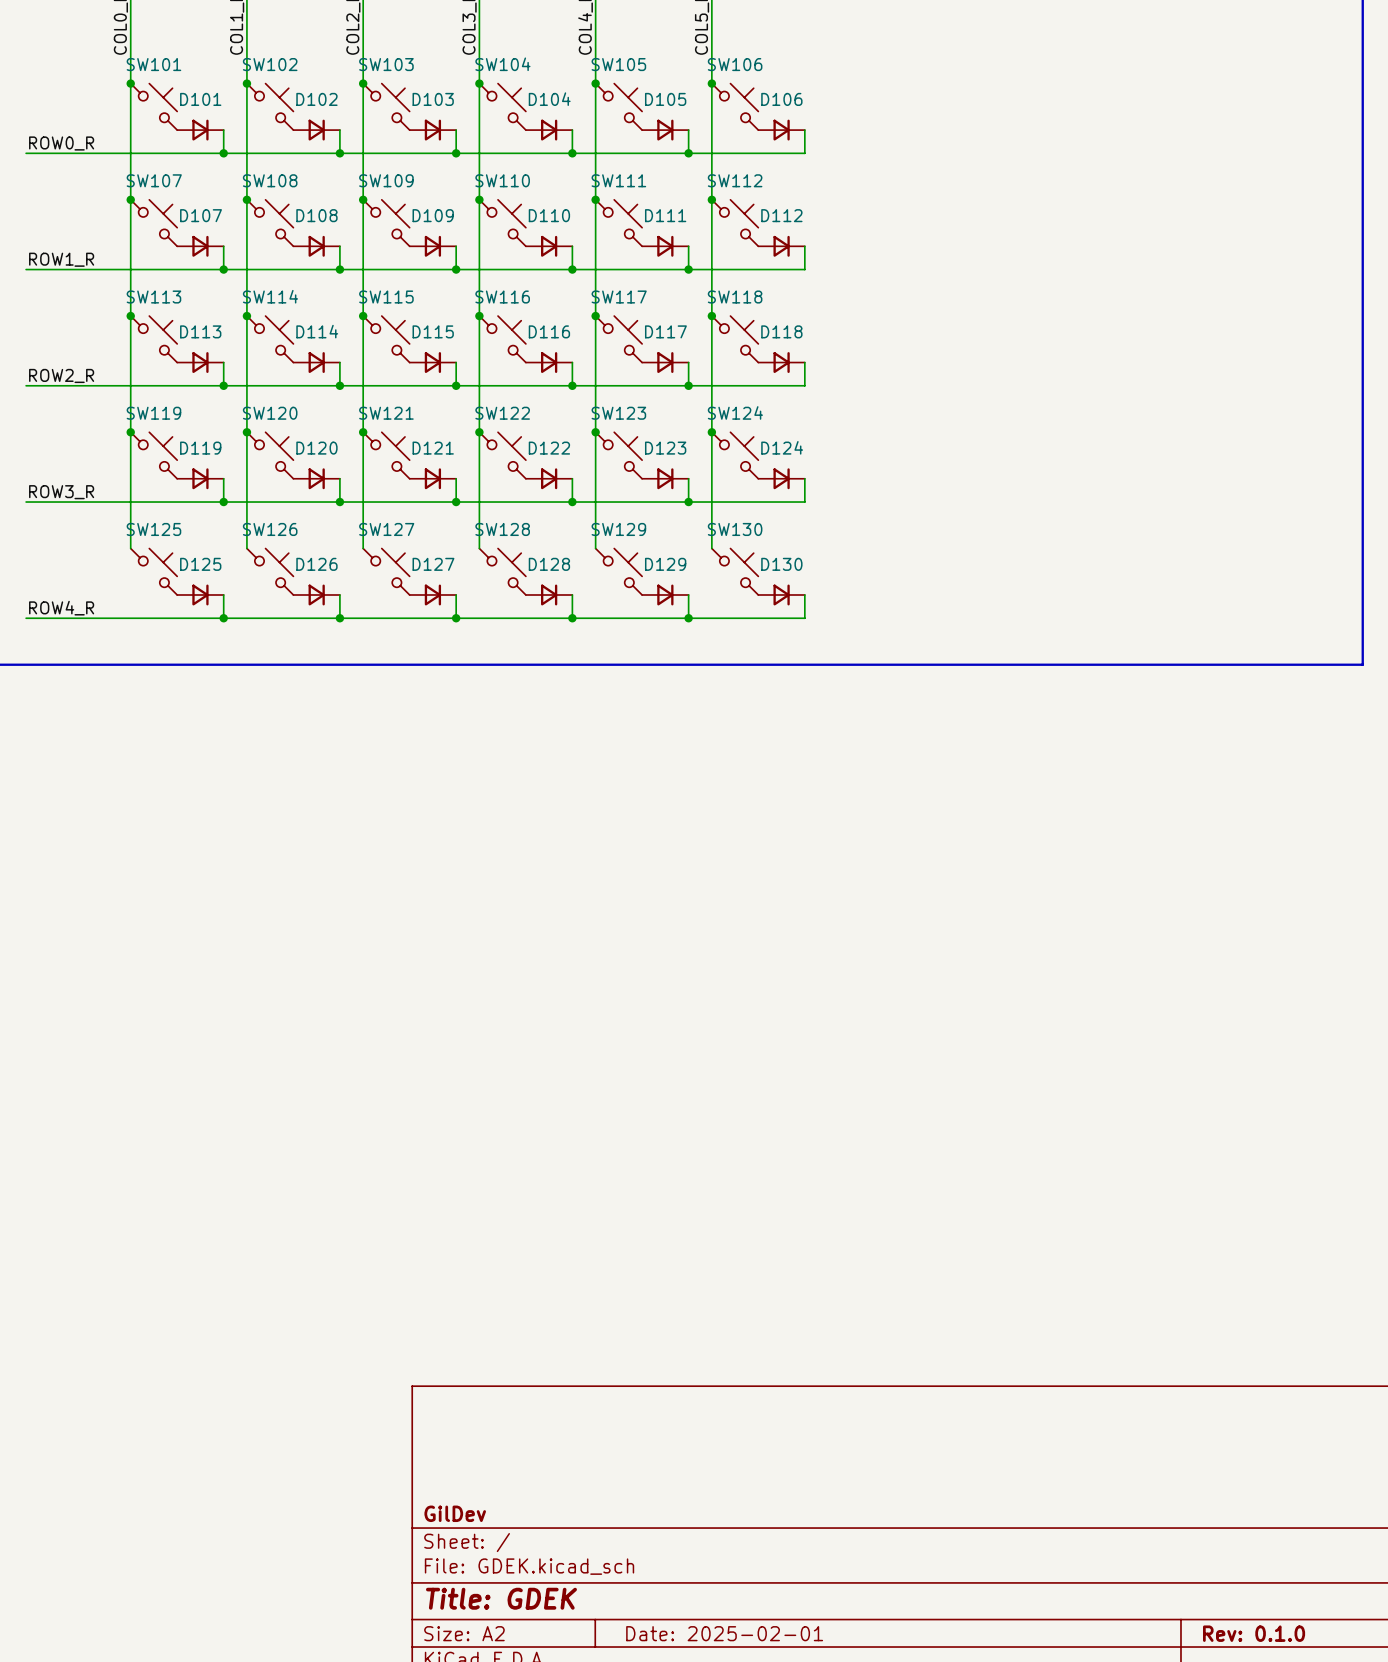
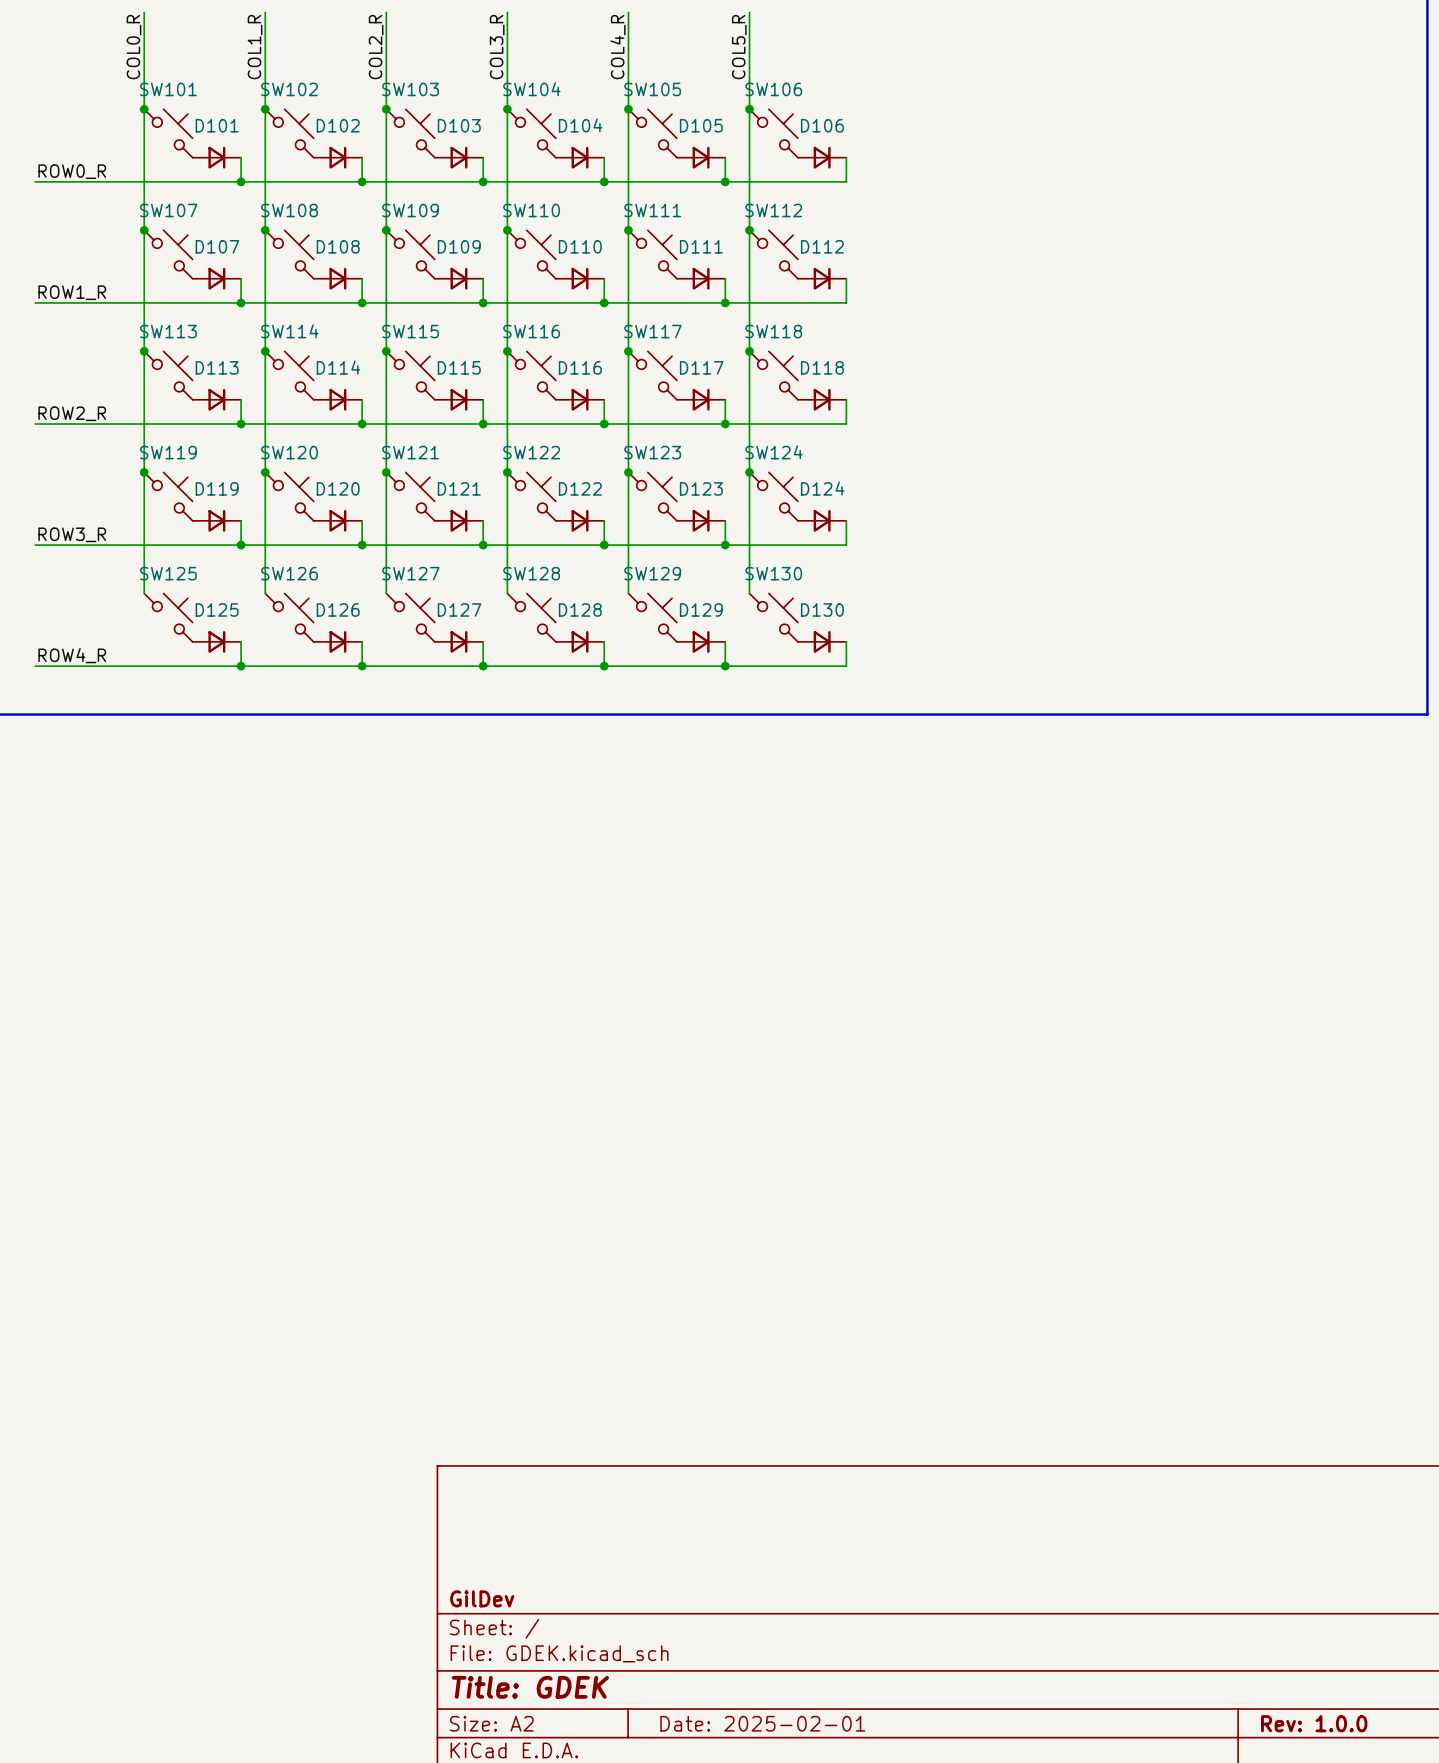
title block: Rev: 0.1.0 (1254, 1633) -> Rev: 1.0.0 (1314, 1723)

